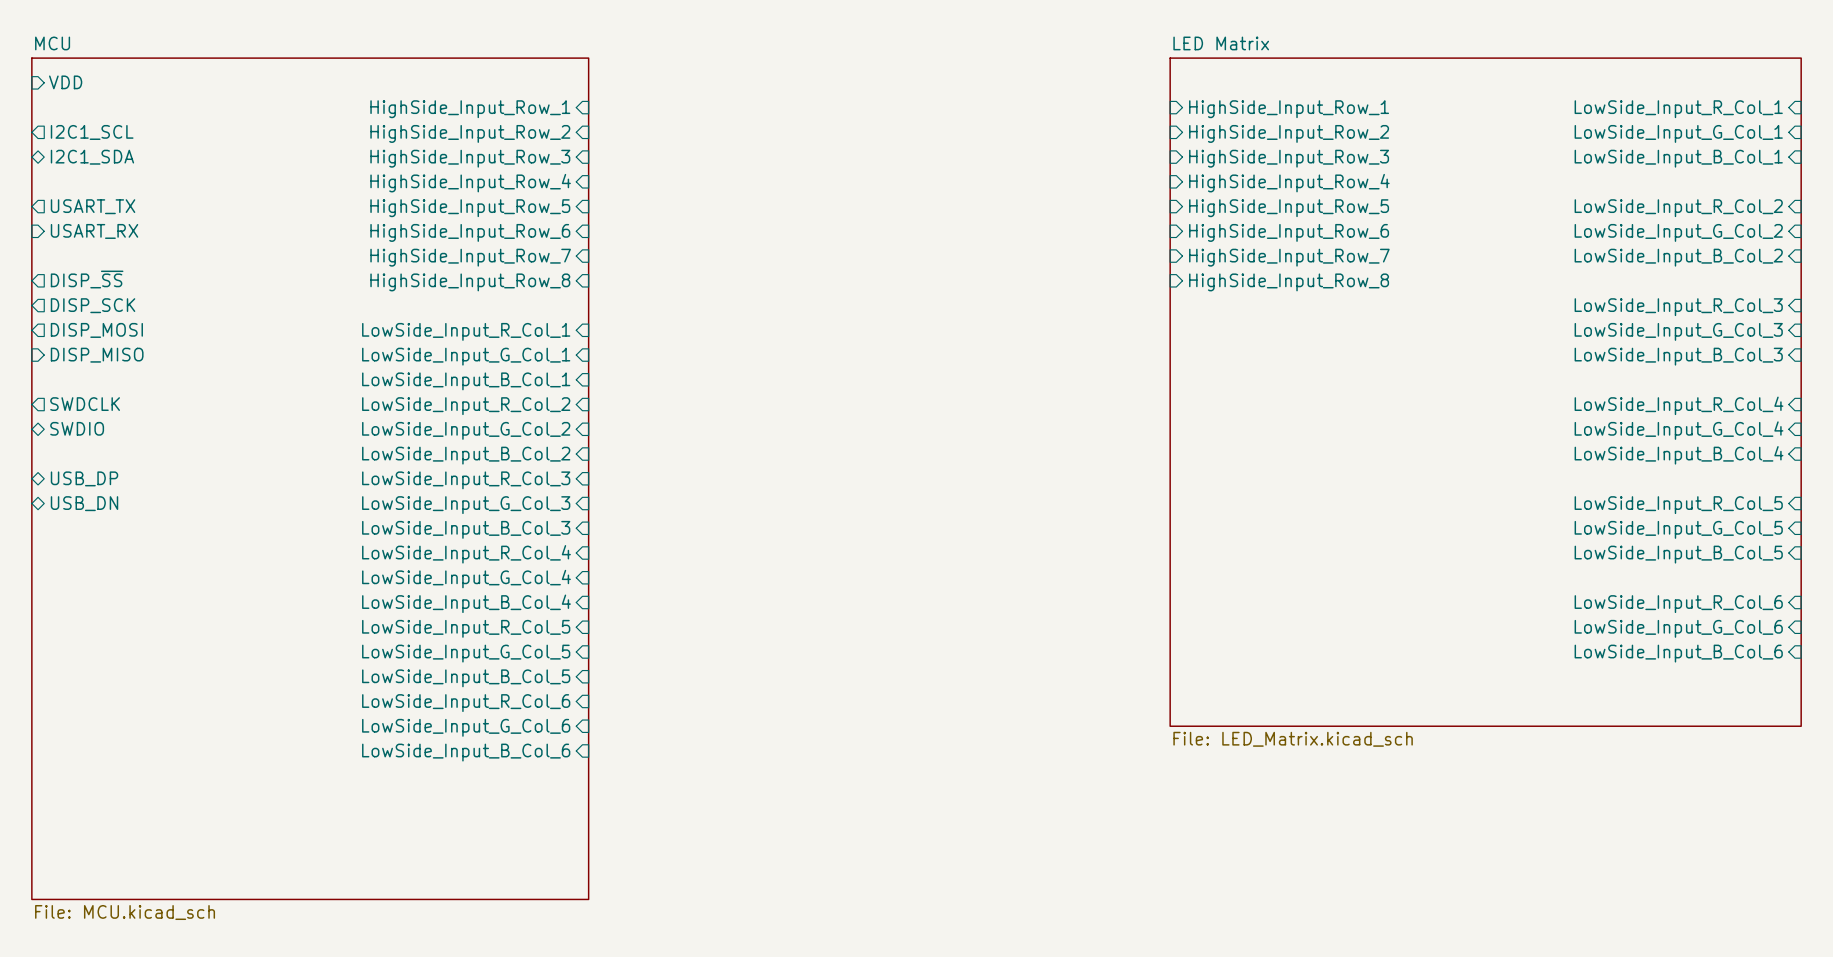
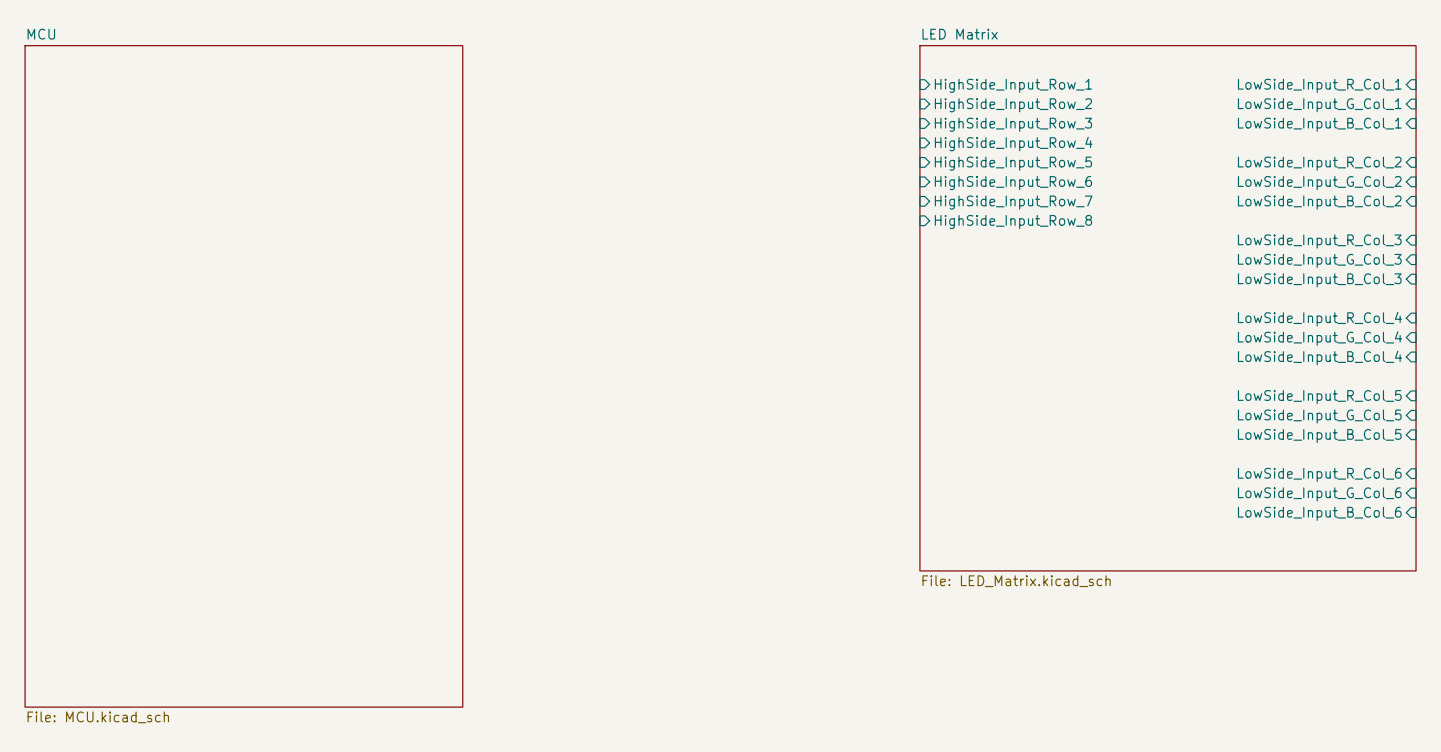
sheet pin: VDD (65, 82) -> none
sheet pin: HighSide_Input_Row_1 (470, 109) -> none
sheet pin: I2C1_SCL (92, 132) -> none
sheet pin: HighSide_Input_Row_2 (470, 133) -> none
sheet pin: I2C1_SDA (92, 157) -> none
sheet pin: HighSide_Input_Row_3 (470, 158) -> none
sheet pin: HighSide_Input_Row_4 (470, 183) -> none
sheet pin: USART_TX (93, 206) -> none
sheet pin: HighSide_Input_Row_5 (470, 208) -> none
sheet pin: USART_RX (94, 231) -> none
sheet pin: HighSide_Input_Row_6 (470, 232) -> none
sheet pin: HighSide_Input_Row_7 (470, 257) -> none
sheet pin: DISP_~{SS} (87, 279) -> none
sheet pin: HighSide_Input_Row_8 (470, 282) -> none
sheet pin: DISP_SCK (93, 305) -> none
sheet pin: DISP_MOSI (96, 330) -> none
sheet pin: LowSide_Input_R_Col_1 (466, 331) -> none
sheet pin: DISP_MISO (97, 355) -> none
sheet pin: LowSide_Input_G_Col_1 (466, 356) -> none
sheet pin: LowSide_Input_B_Col_1 (466, 381) -> none
sheet pin: SWDCLK (85, 404) -> none
sheet pin: LowSide_Input_R_Col_2 (466, 406) -> none
sheet pin: SWDIO (77, 428) -> none
sheet pin: LowSide_Input_G_Col_2 (466, 430) -> none
sheet pin: LowSide_Input_B_Col_2 (466, 455) -> none
sheet pin: USB_DP (84, 478) -> none
sheet pin: LowSide_Input_R_Col_3 (466, 480) -> none
sheet pin: USB_DN (84, 503) -> none
sheet pin: LowSide_Input_G_Col_3 (466, 505) -> none
sheet pin: LowSide_Input_B_Col_3 (466, 529) -> none
sheet pin: LowSide_Input_R_Col_4 (466, 554) -> none
sheet pin: LowSide_Input_G_Col_4 (466, 579) -> none
sheet pin: LowSide_Input_B_Col_4 (466, 603) -> none
sheet pin: LowSide_Input_R_Col_5 (466, 628) -> none
sheet pin: LowSide_Input_G_Col_5 (466, 653) -> none
sheet pin: LowSide_Input_B_Col_5 (466, 678) -> none
sheet pin: LowSide_Input_R_Col_6 (466, 703) -> none
sheet pin: LowSide_Input_G_Col_6 (466, 727) -> none
sheet pin: LowSide_Input_B_Col_6 (466, 752) -> none

